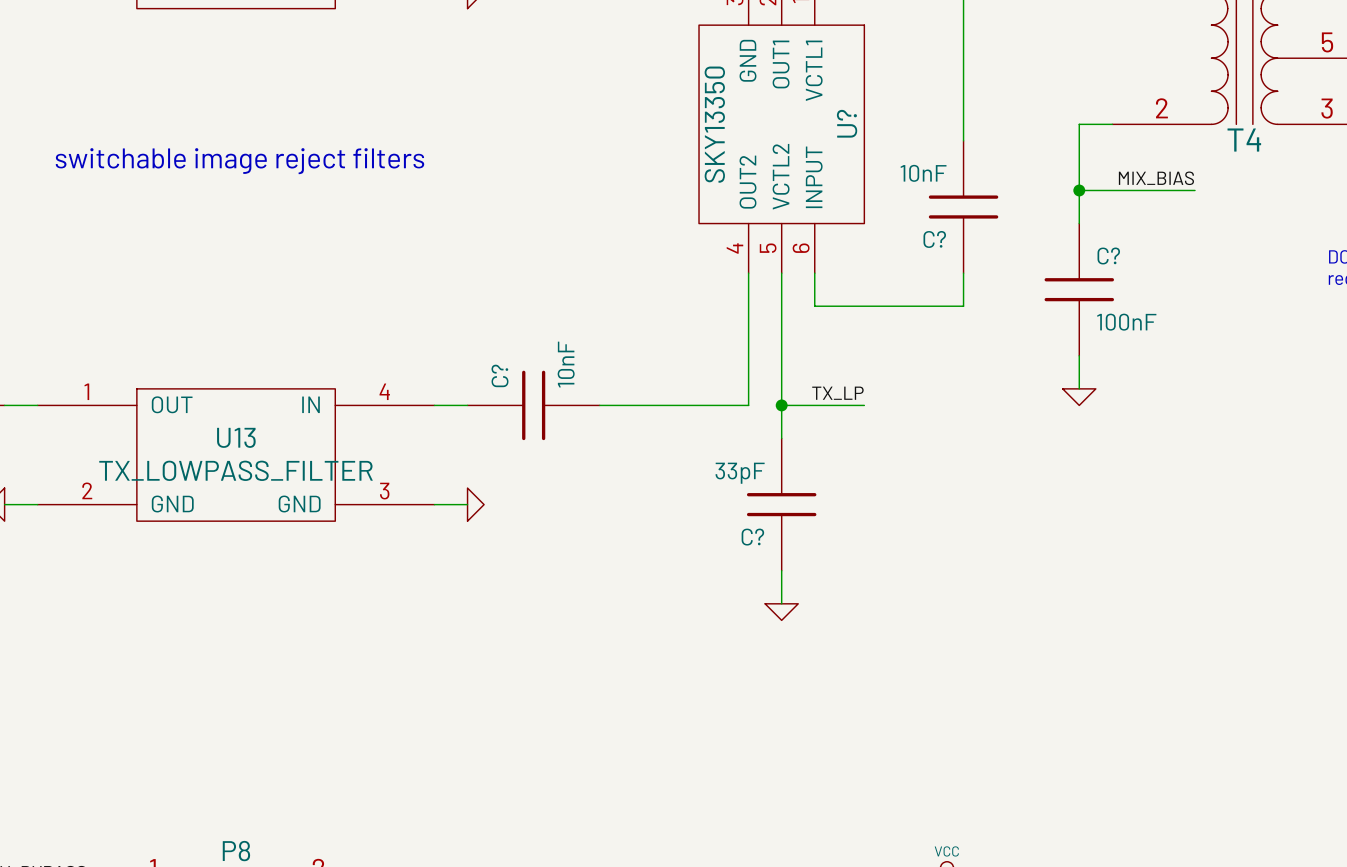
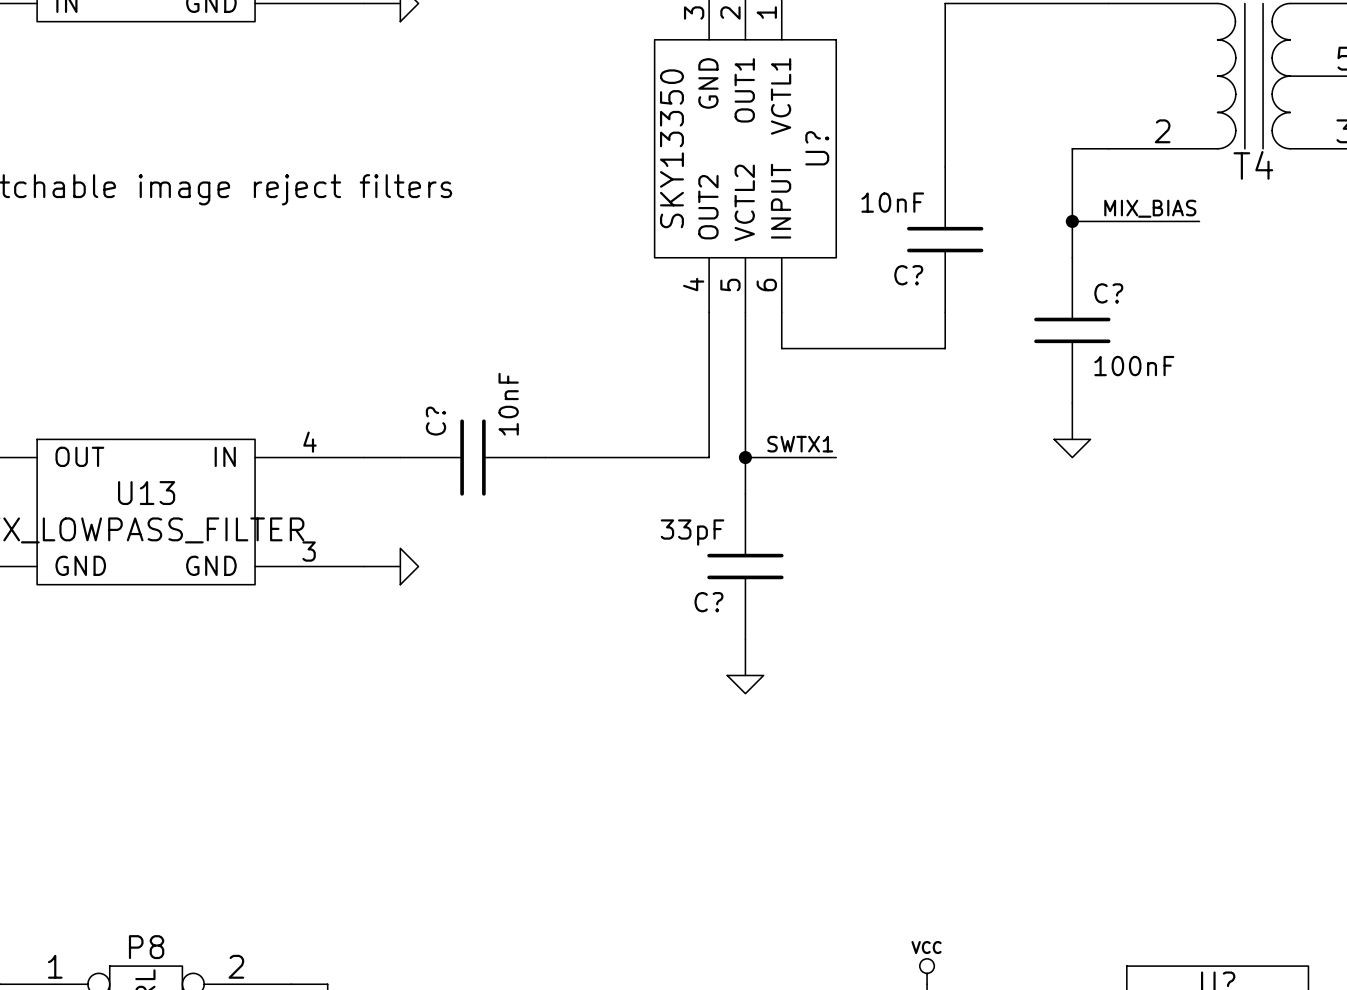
label: TX_LP (837, 393) -> SWTX1 (800, 444)

